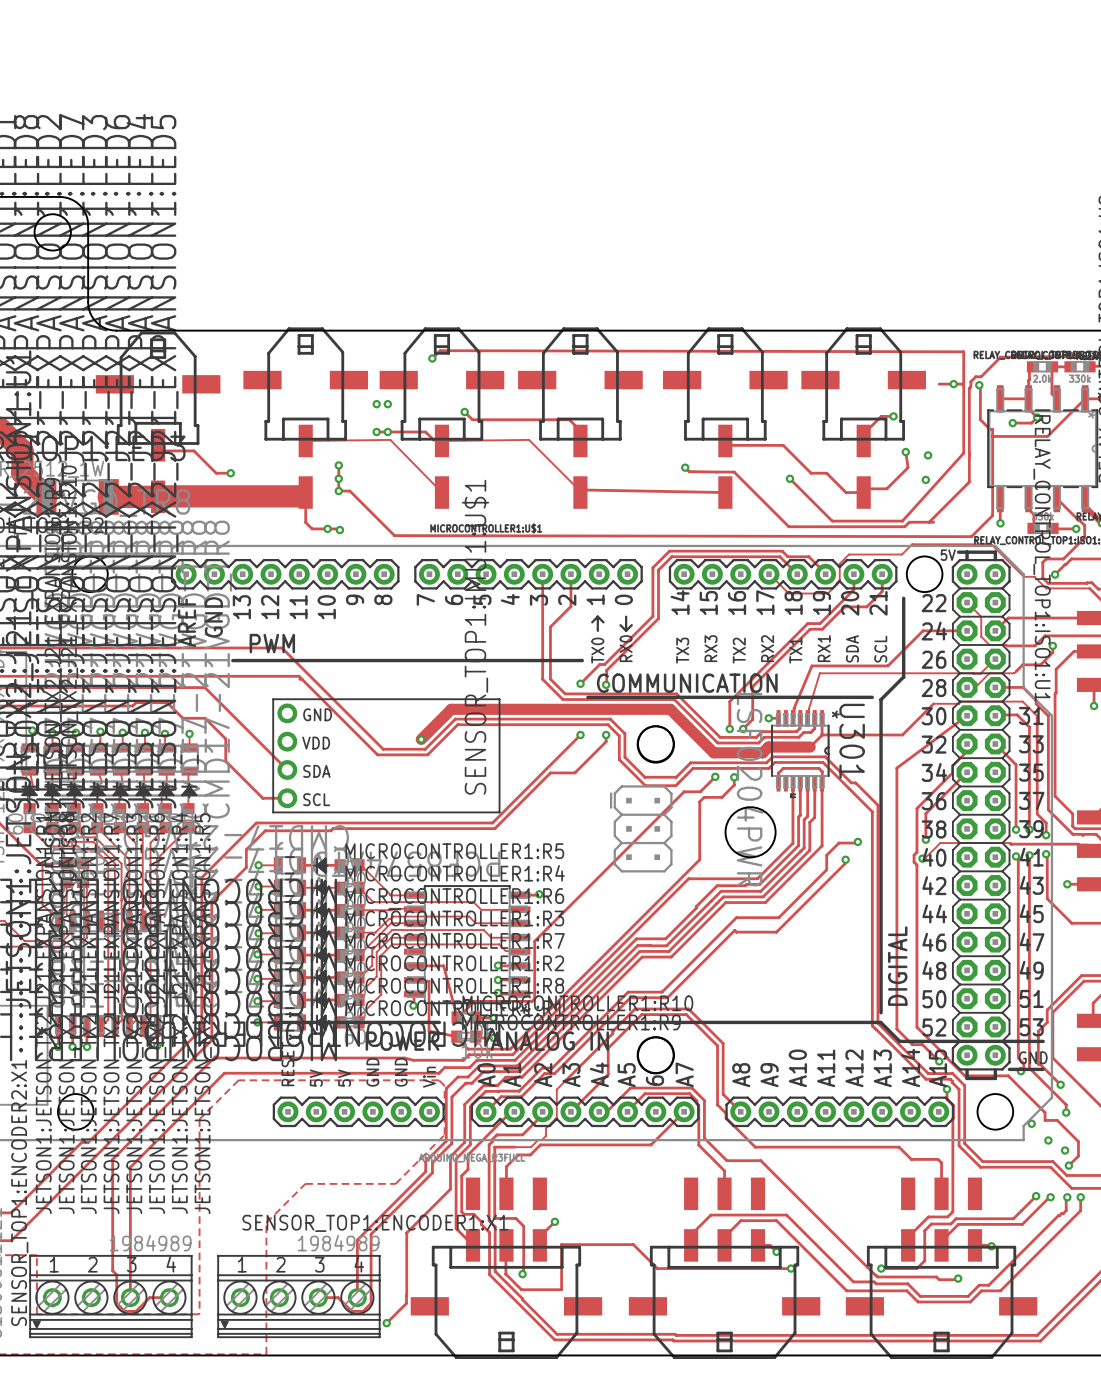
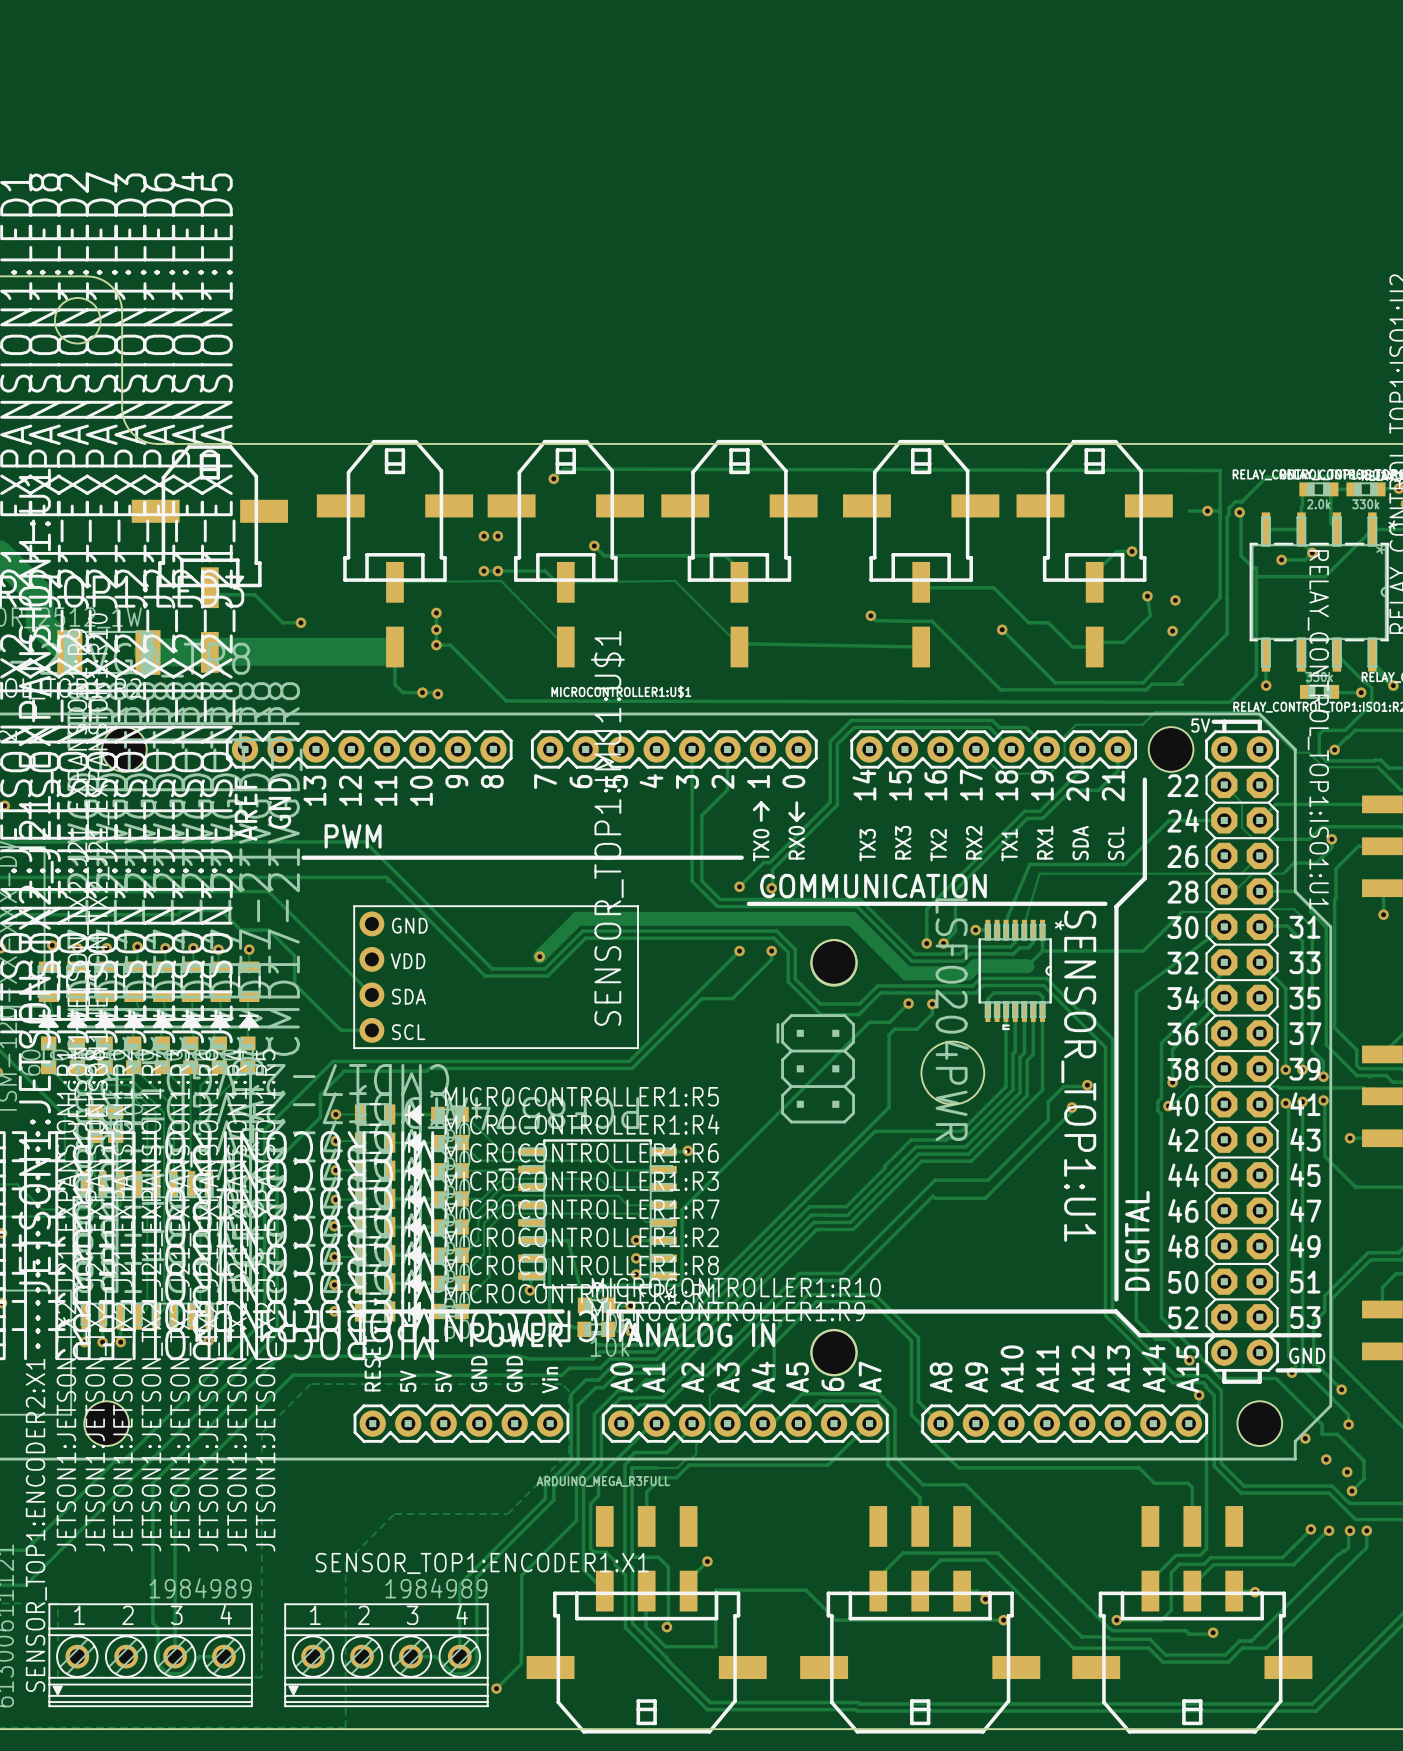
U301 name: U301 (852, 741) -> SENSOR_TOP1:U1 (1078, 1076)

